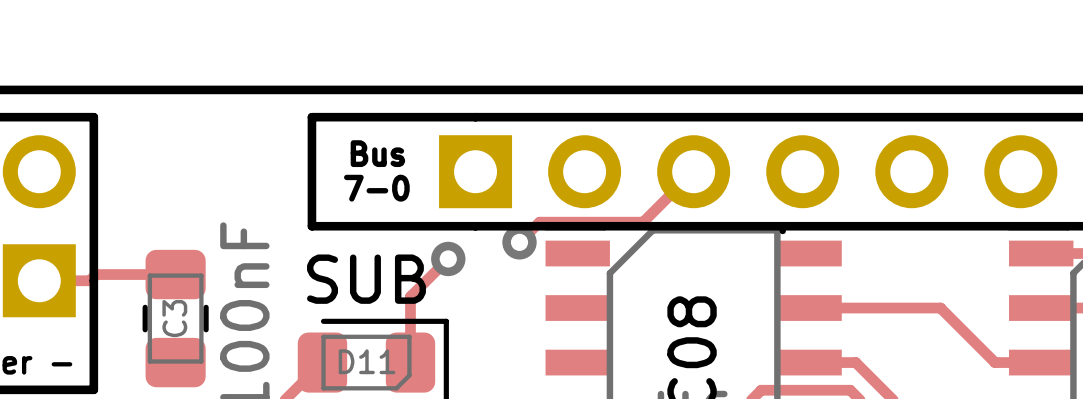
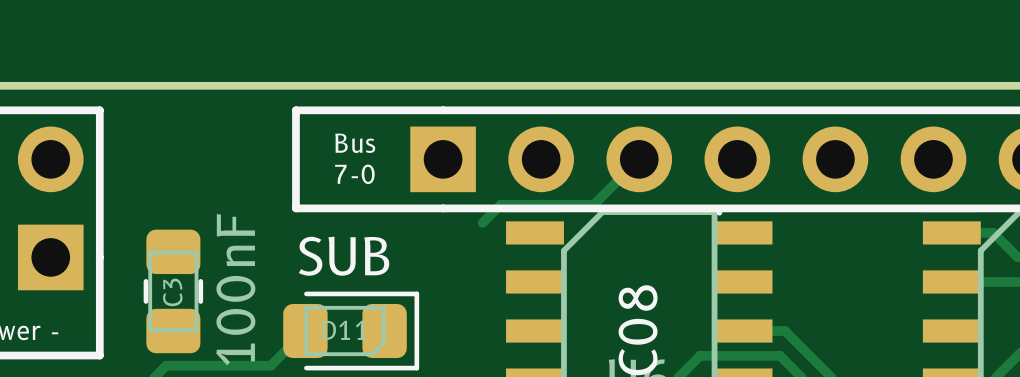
via: (519, 242) -> none
track: (448, 258) (410, 296) (410, 362) -> none
via: (448, 258) -> none
track: (175, 274) (95, 274) (89, 280) (39, 280) -> none
track: (809, 308) (940, 308) (995, 362) (1041, 362) -> none

